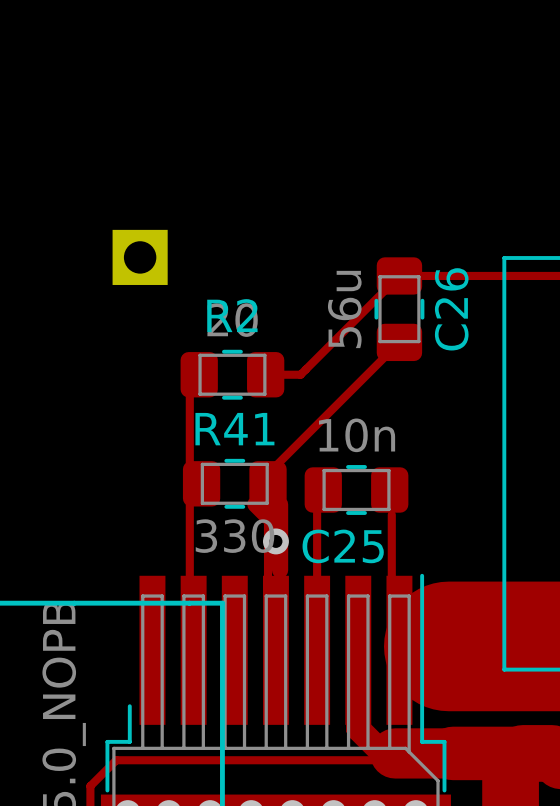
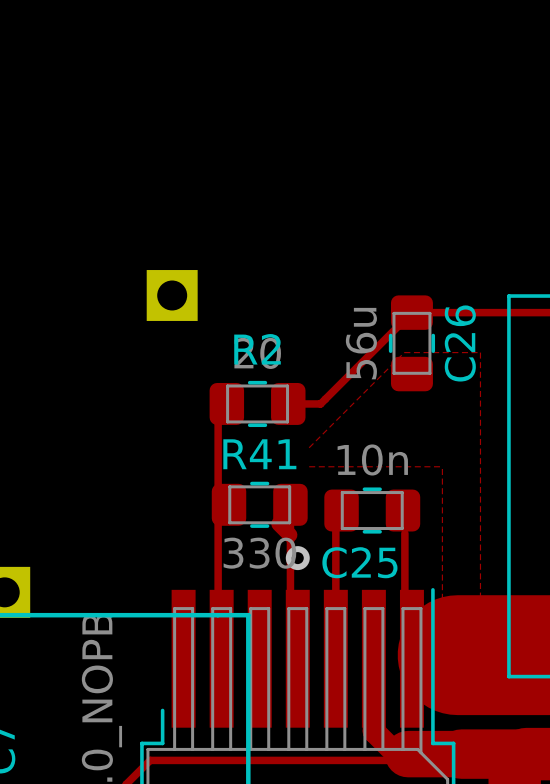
track: (399, 342) (275, 465) -> none
zone outline: none -> (309, 447) (404, 352) (480, 352) (480, 618) (442, 618) (442, 466) (309, 466)
track: (268, 492) (280, 504) (280, 570) -> none

